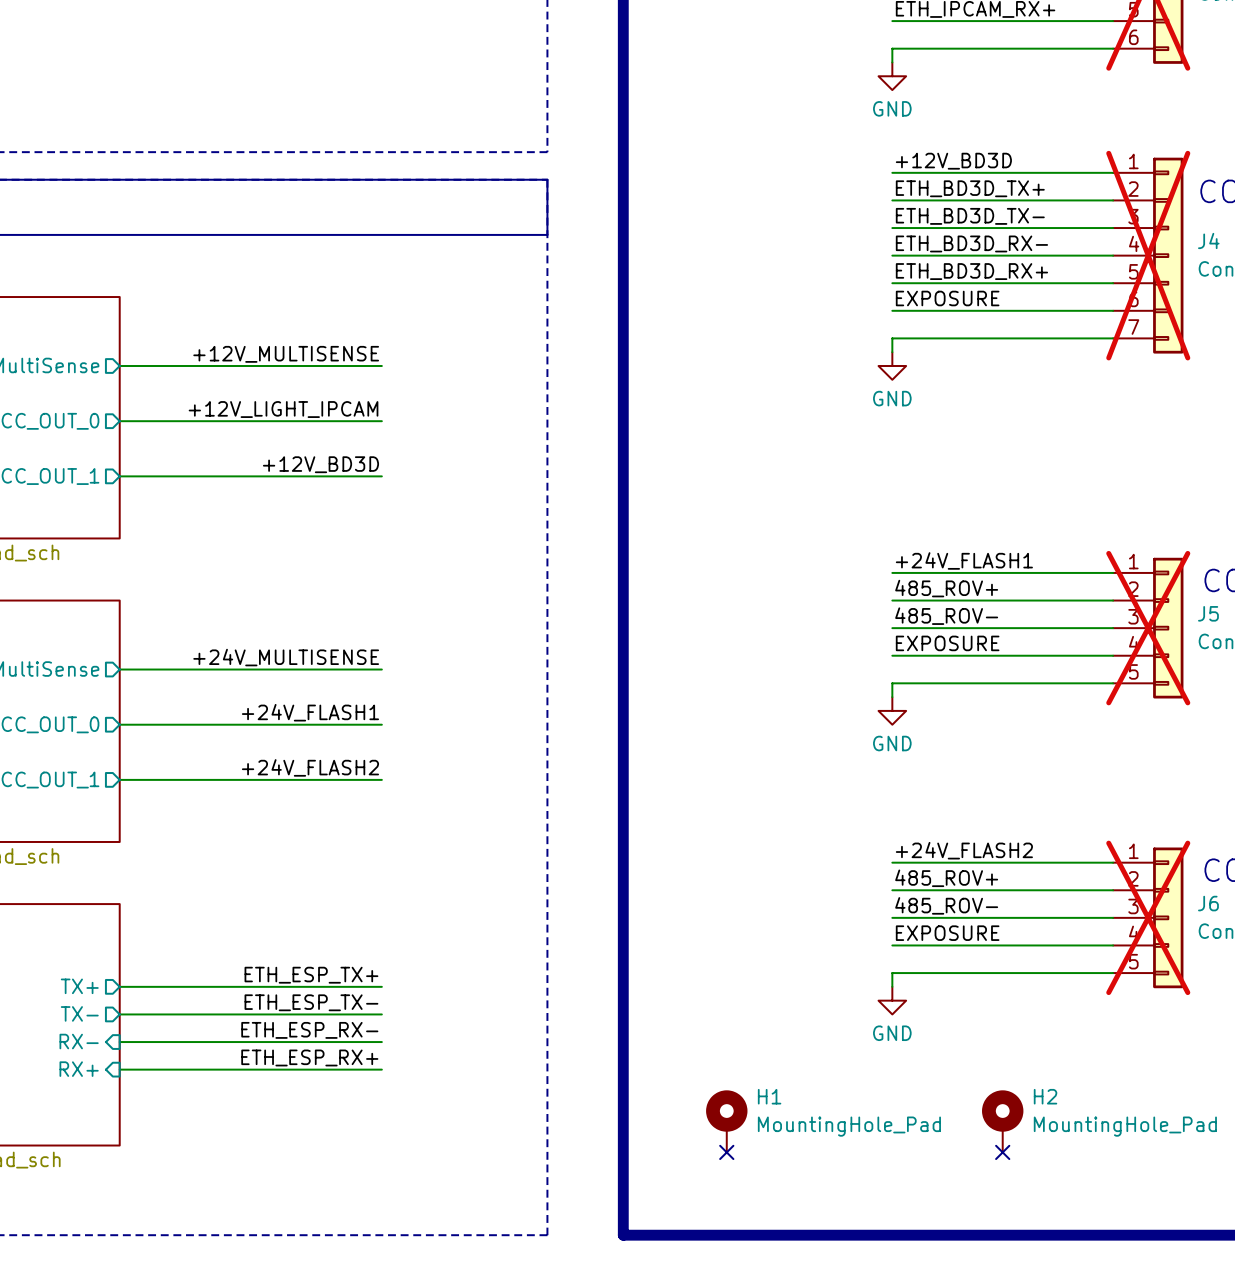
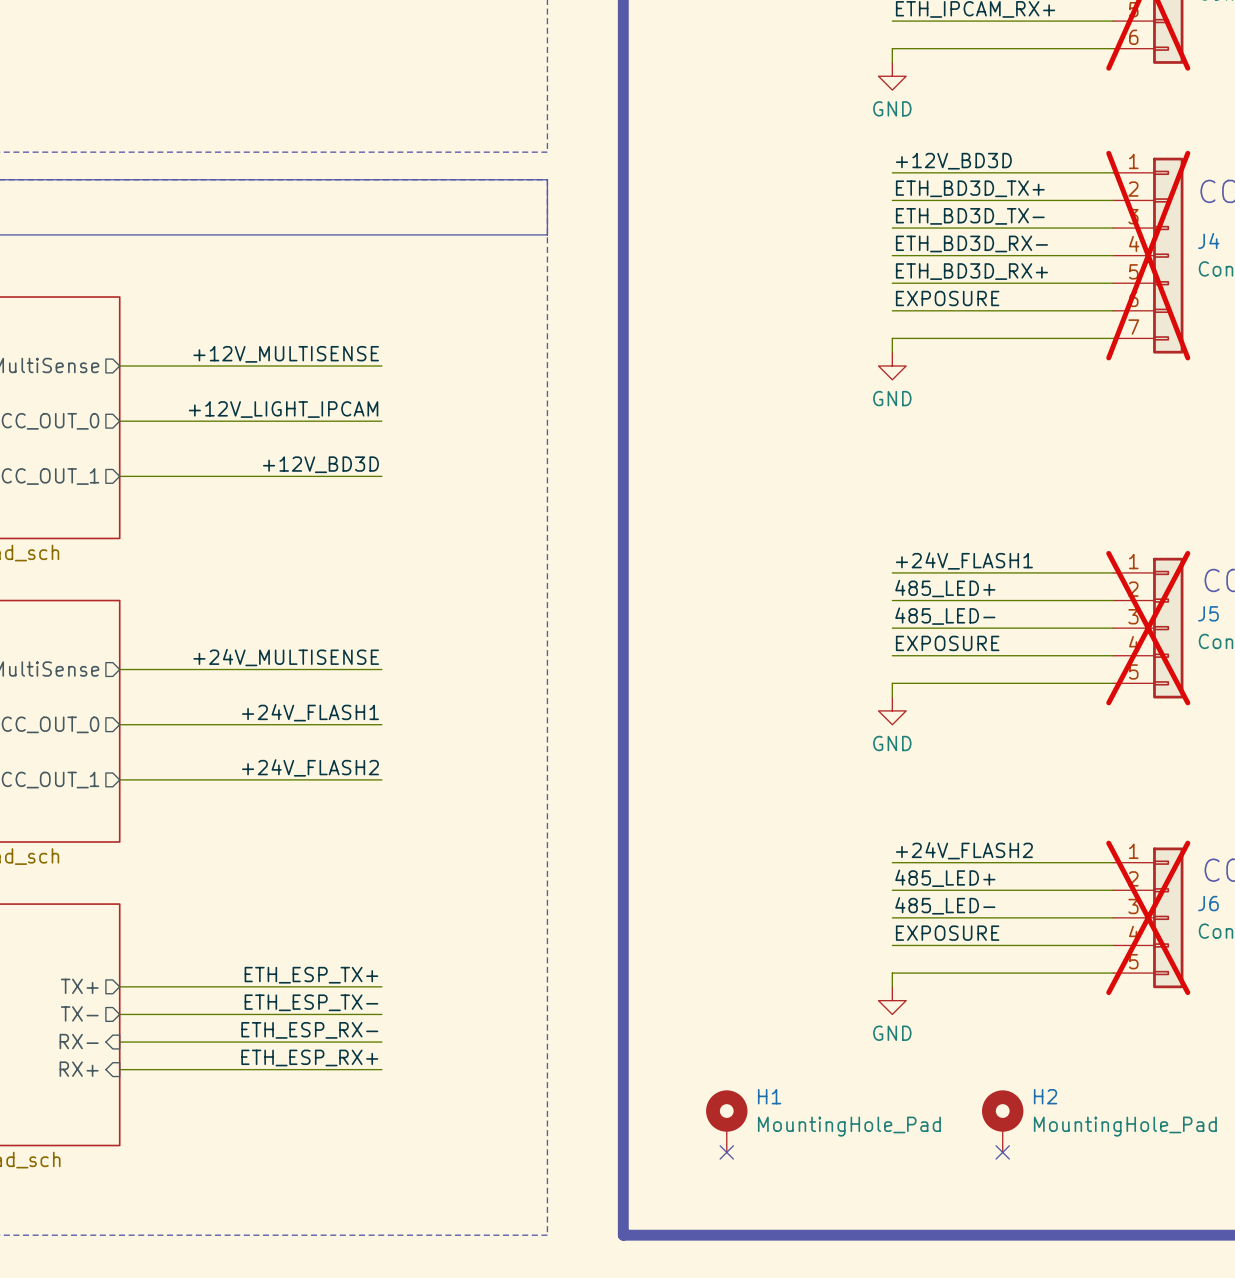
label: 485_ROV+ (946, 588) -> 485_LED+ (945, 588)
label: 485_ROV- (946, 616) -> 485_LED- (945, 616)
label: 485_ROV+ (946, 878) -> 485_LED+ (945, 878)
label: 485_ROV- (946, 905) -> 485_LED- (945, 905)

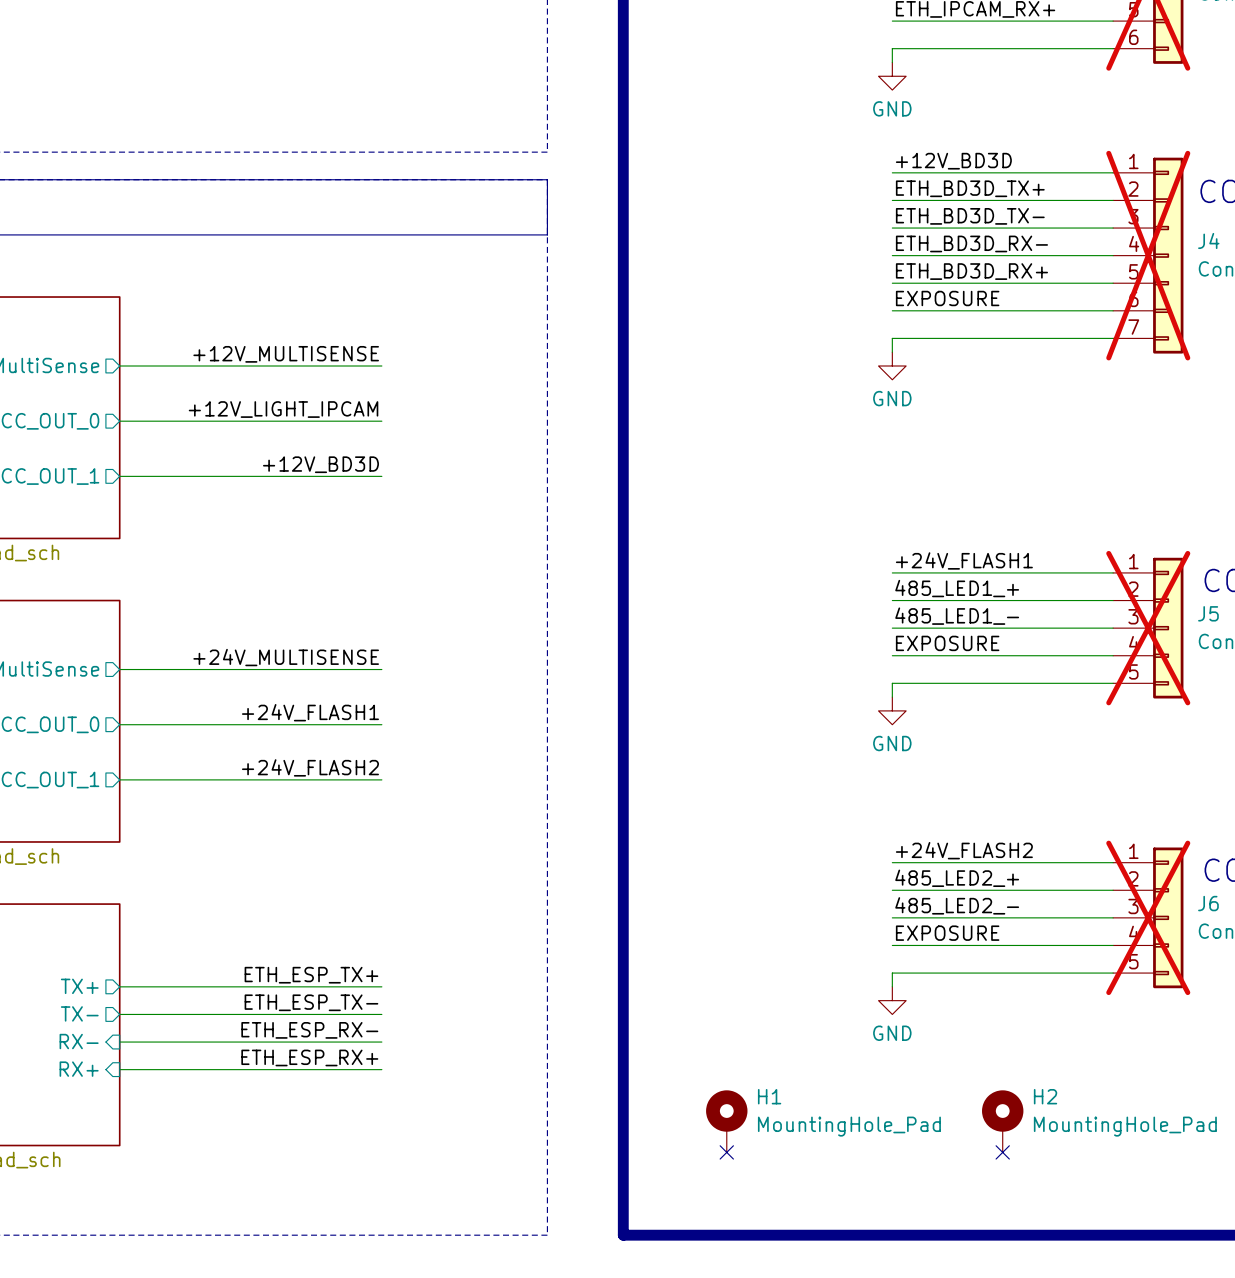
label: 485_LED+ (945, 588) -> 485_LED1_+ (957, 588)
label: 485_LED- (945, 616) -> 485_LED1_- (957, 616)
label: 485_LED+ (945, 878) -> 485_LED2_+ (957, 878)
label: 485_LED- (945, 905) -> 485_LED2_- (957, 905)

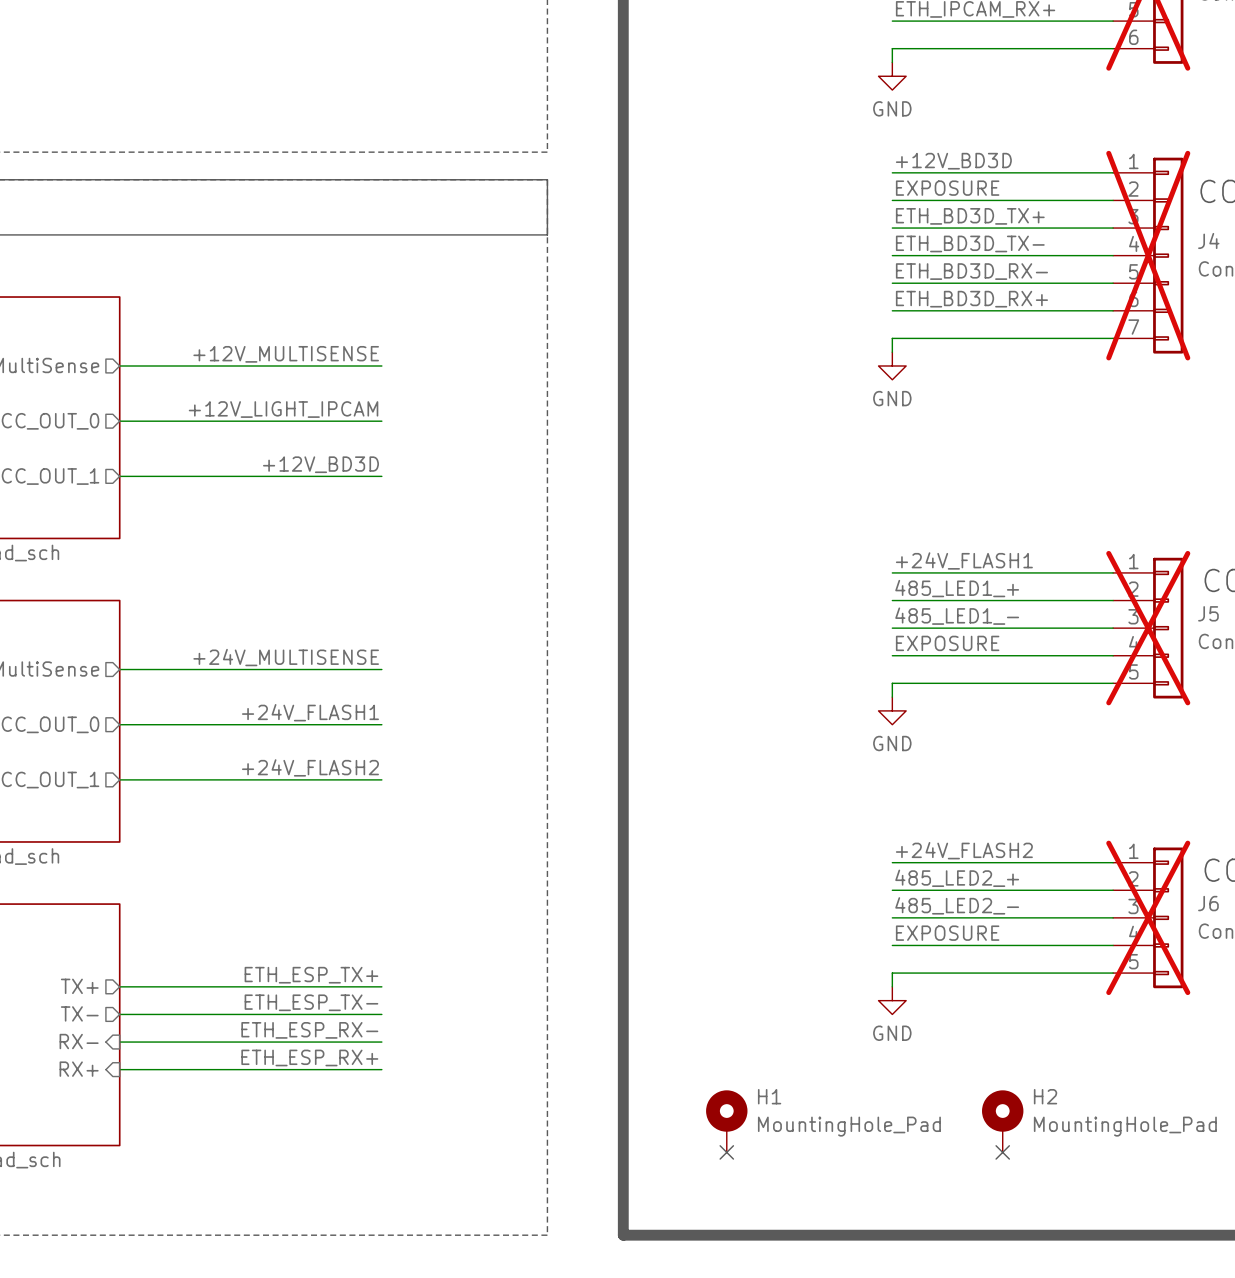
label: ETH_BD3D_TX+ (970, 188) -> EXPOSURE (947, 188)
label: ETH_BD3D_TX- (970, 216) -> ETH_BD3D_TX+ (970, 216)
label: ETH_BD3D_RX- (971, 243) -> ETH_BD3D_TX- (970, 243)
label: ETH_BD3D_RX+ (971, 271) -> ETH_BD3D_RX- (971, 271)
label: EXPOSURE (947, 298) -> ETH_BD3D_RX+ (971, 299)

